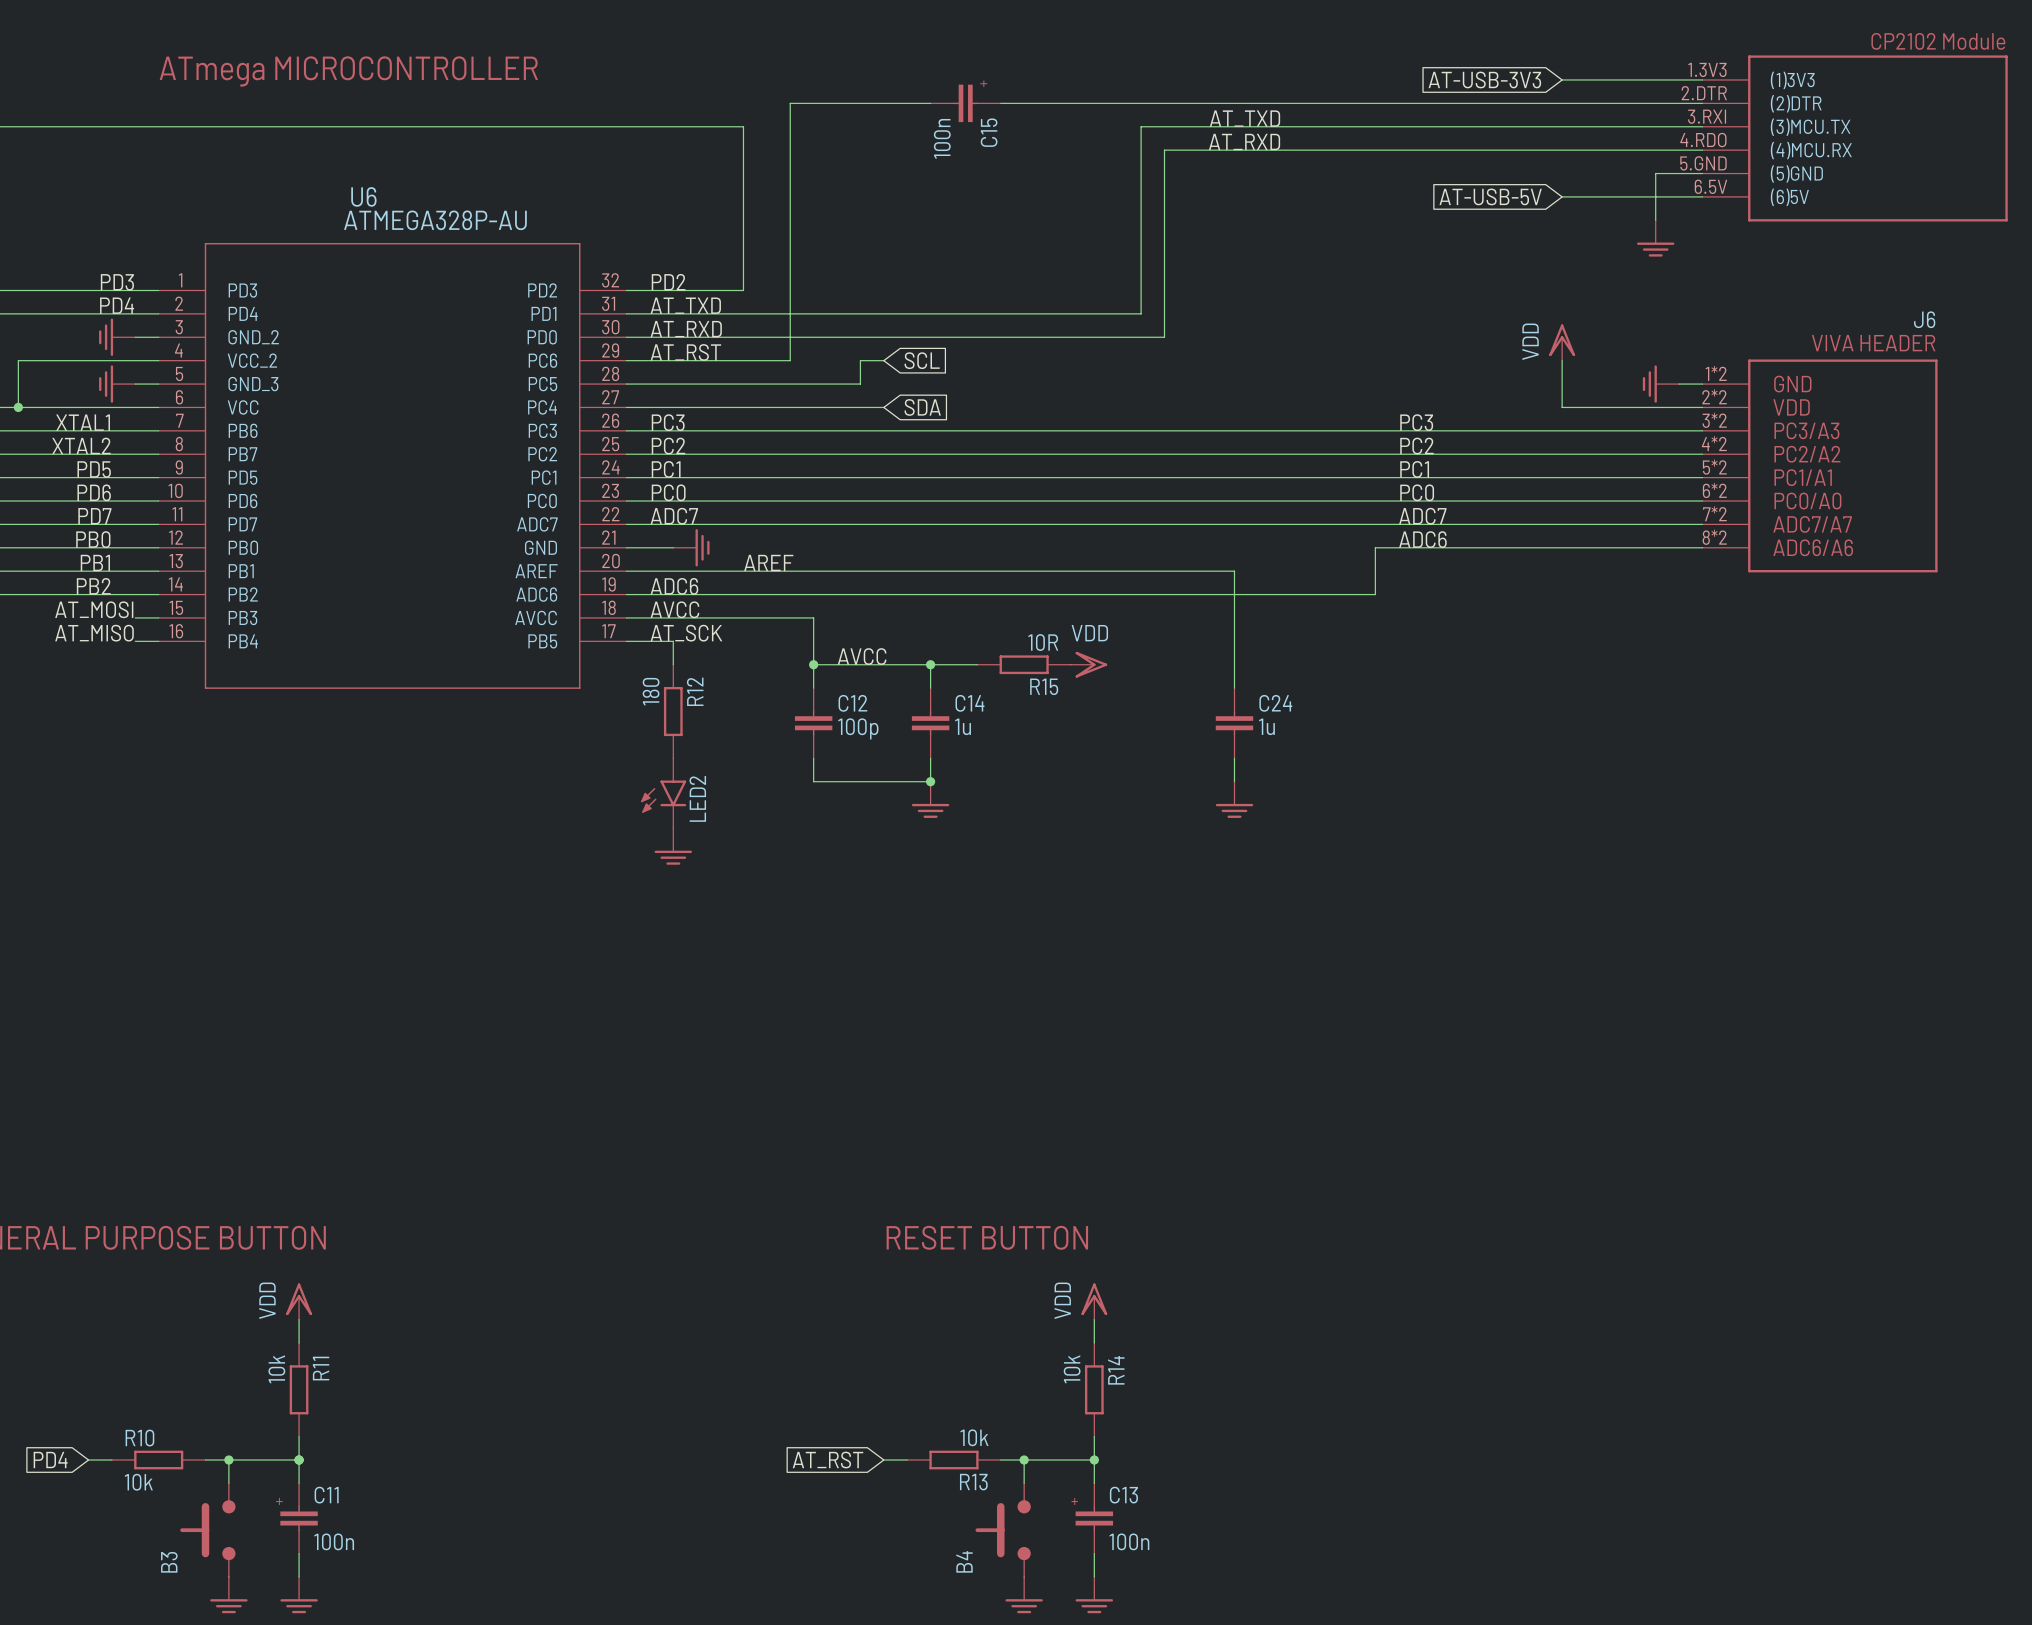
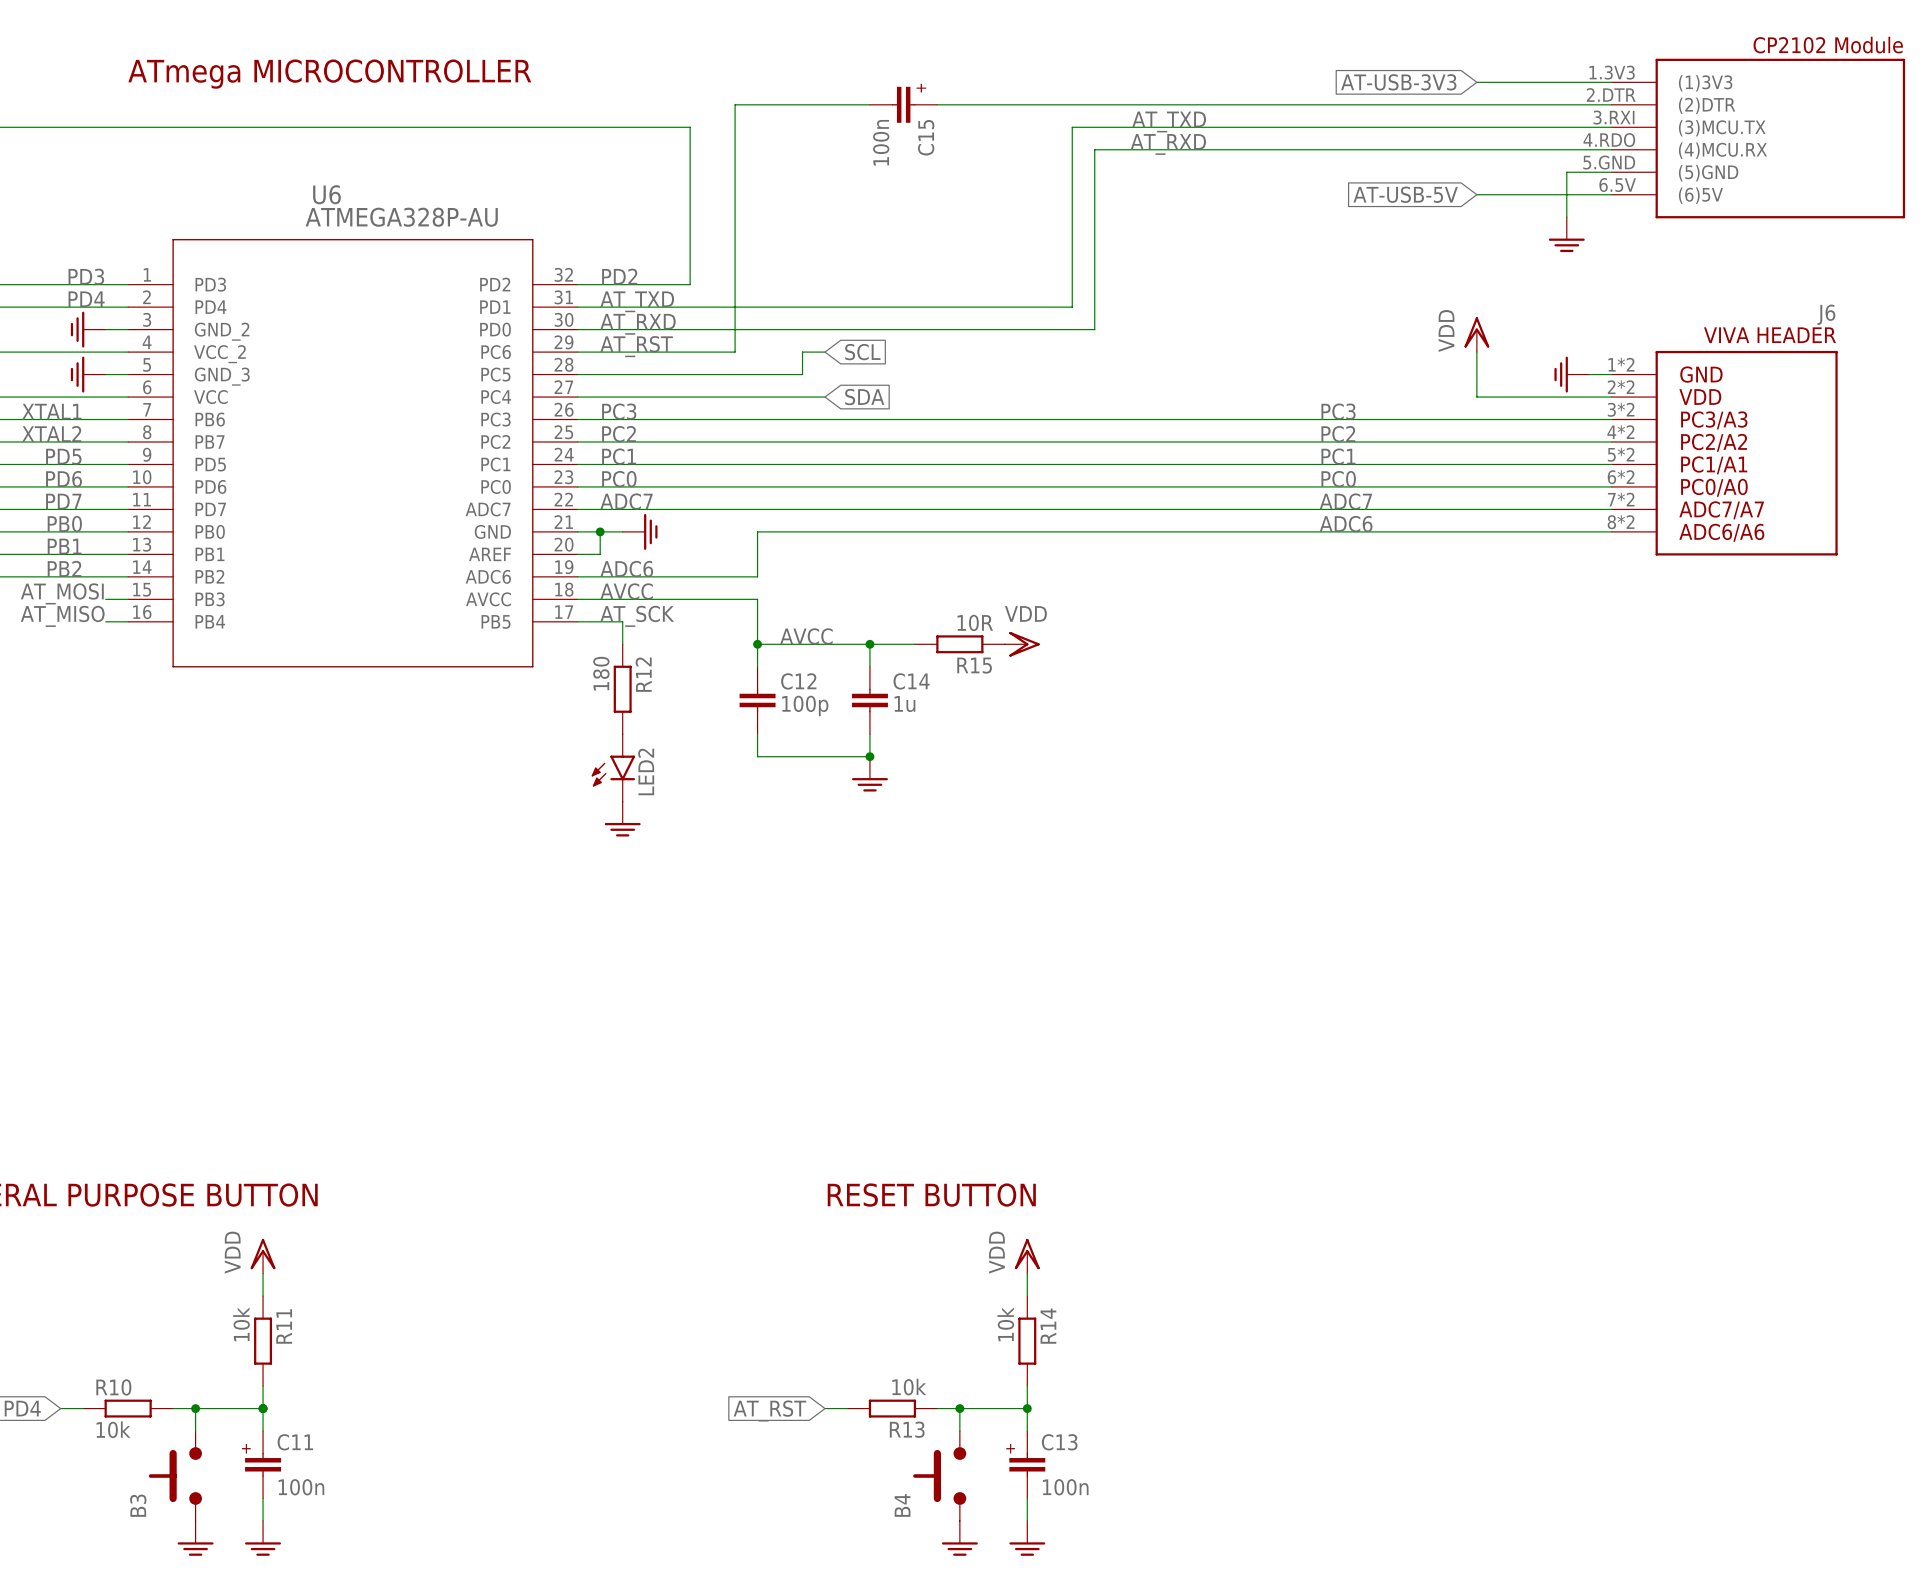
junction: none -> (600, 531)
wire: (1375, 547) (1375, 594) (813, 594) -> (1297, 531) (757, 531) (757, 576)
label: AREF (768, 562) -> none
wire: (649, 571) (1234, 571) (1234, 688) -> (600, 554) (600, 531)
C24: 1u (1234, 723) -> none
wire: (1234, 758) (1234, 781) -> none
power symbol: (1234, 799) -> none

